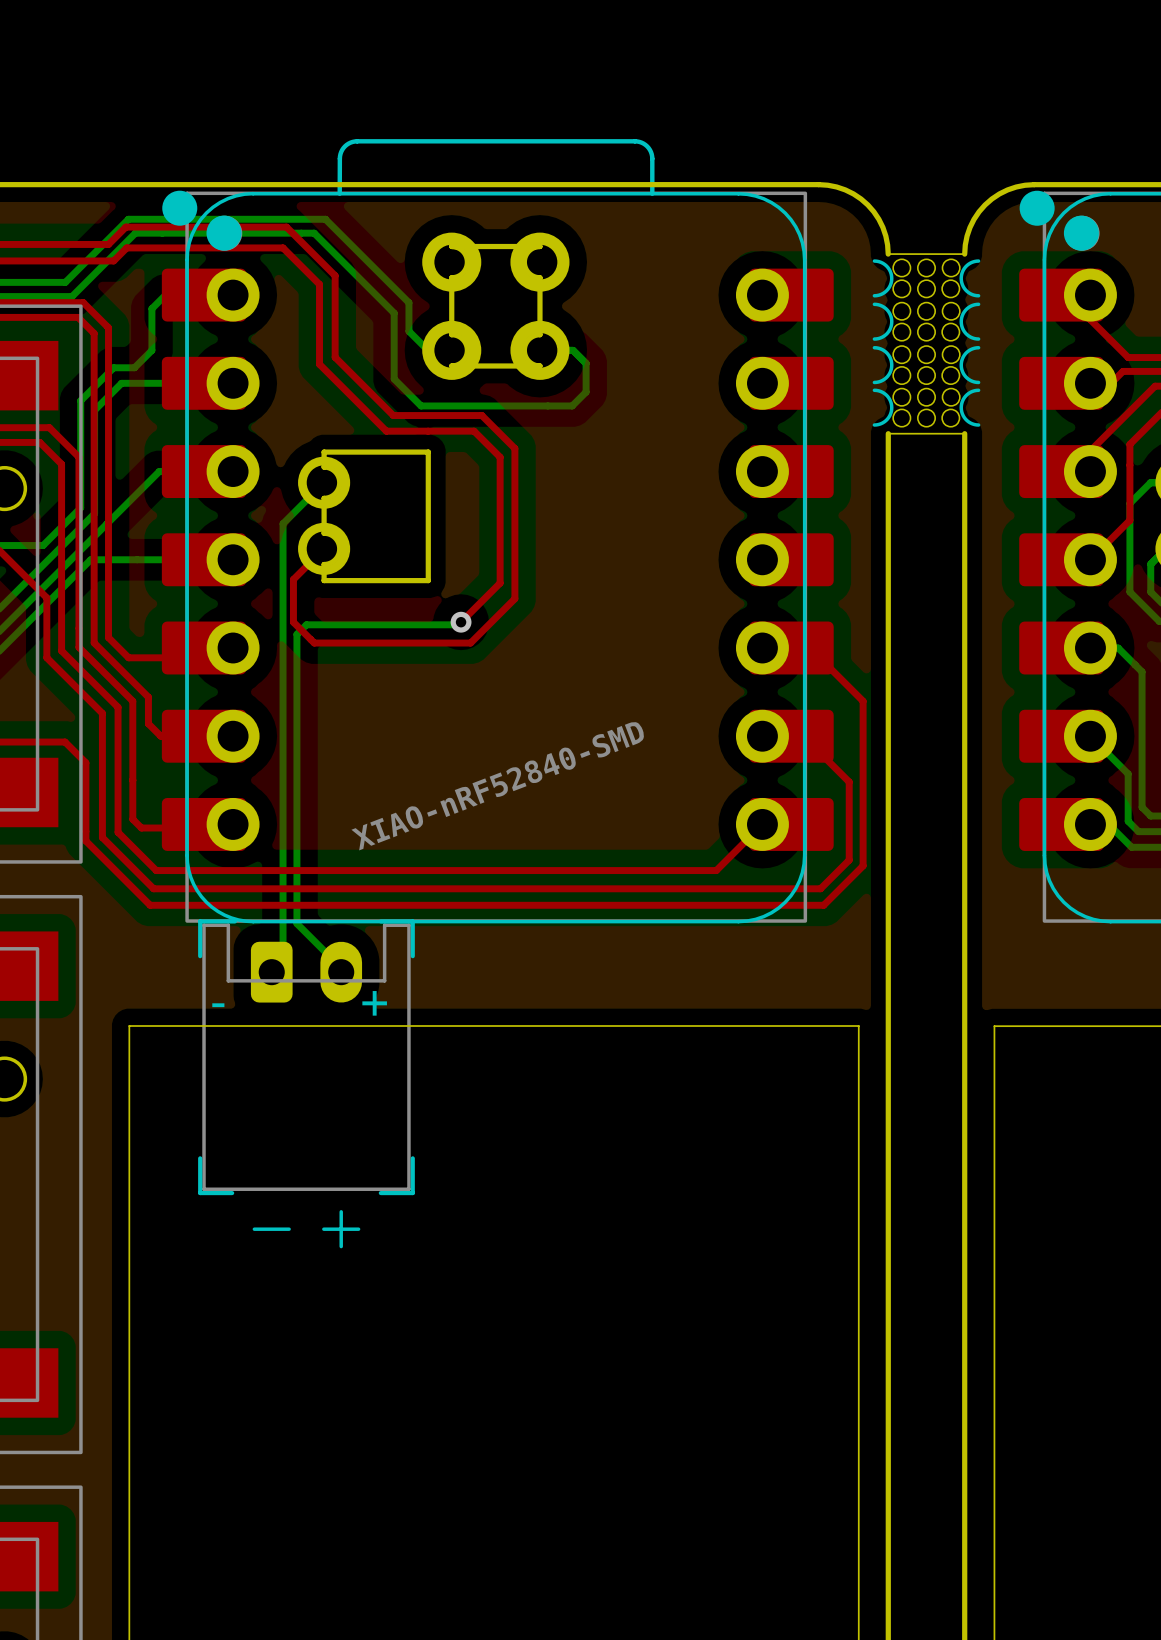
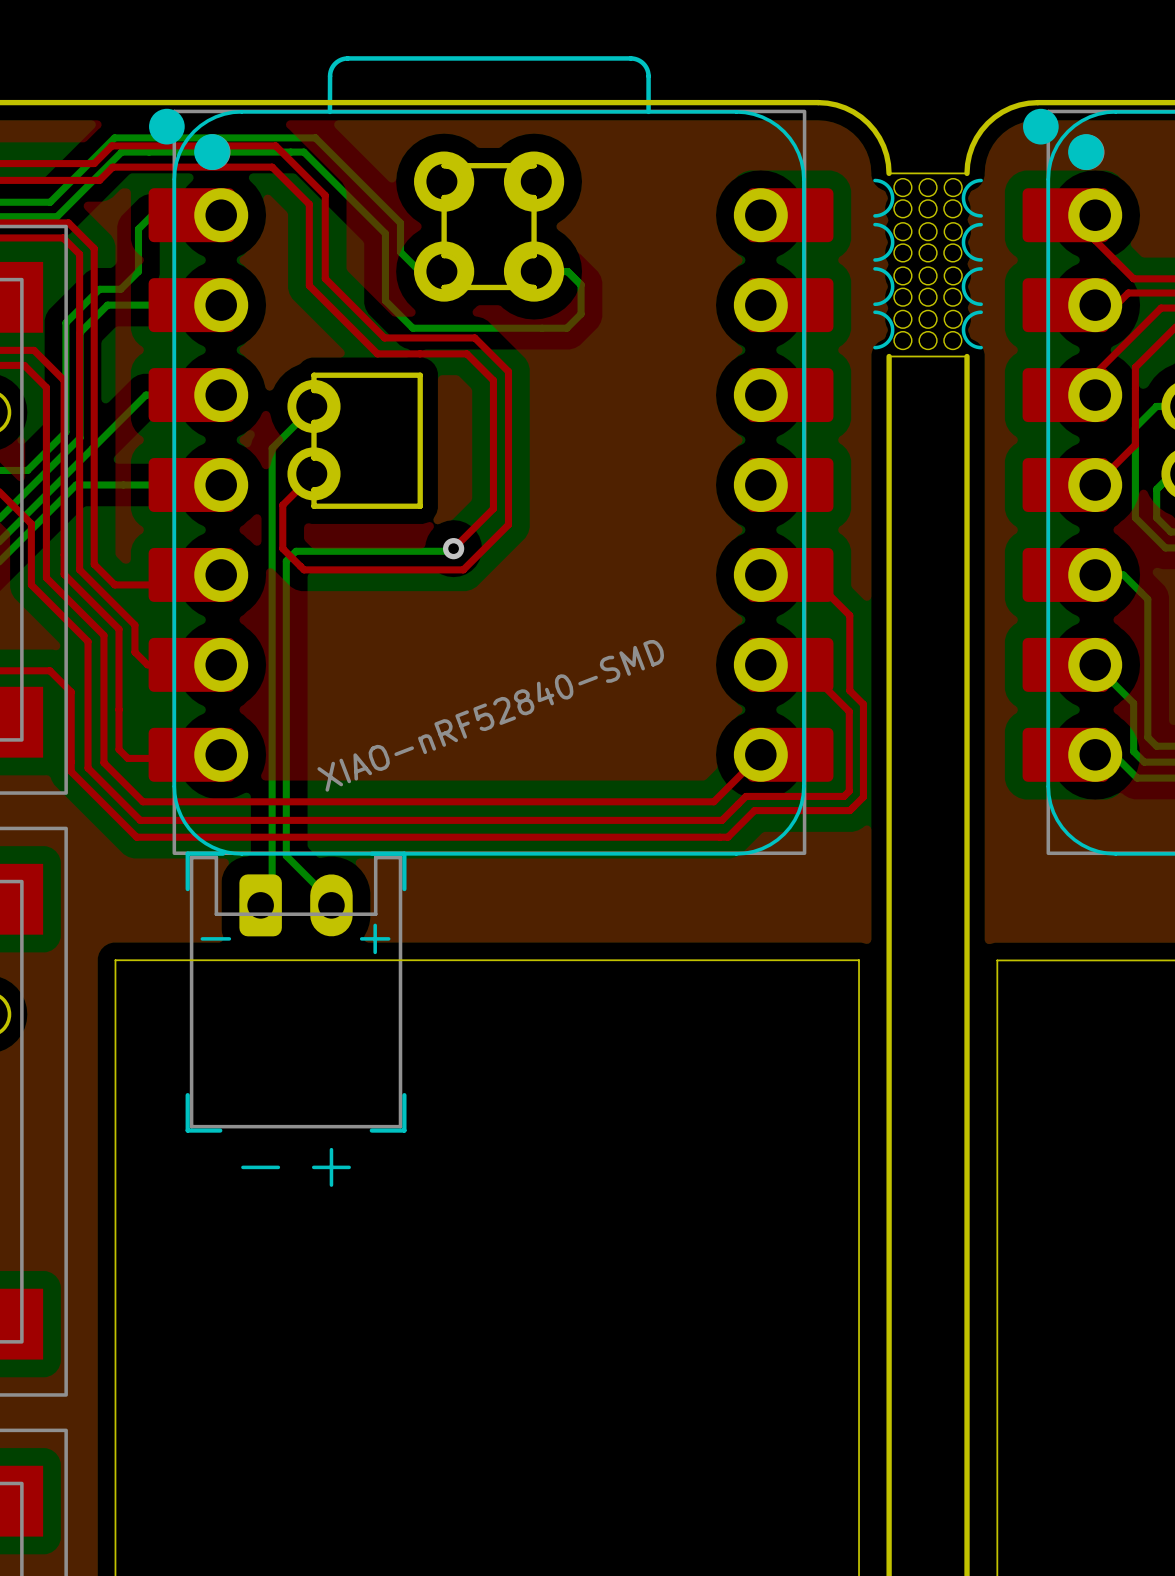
top track: (849, 687) (863, 701) (863, 774) -> (849, 615) (849, 690) (863, 704)
top track: (844, 865) (820, 888) (724, 888) -> (844, 796) (745, 796) (721, 820)
top track: (849, 879) (823, 905) (730, 905) -> (849, 810) (754, 810) (727, 837)

